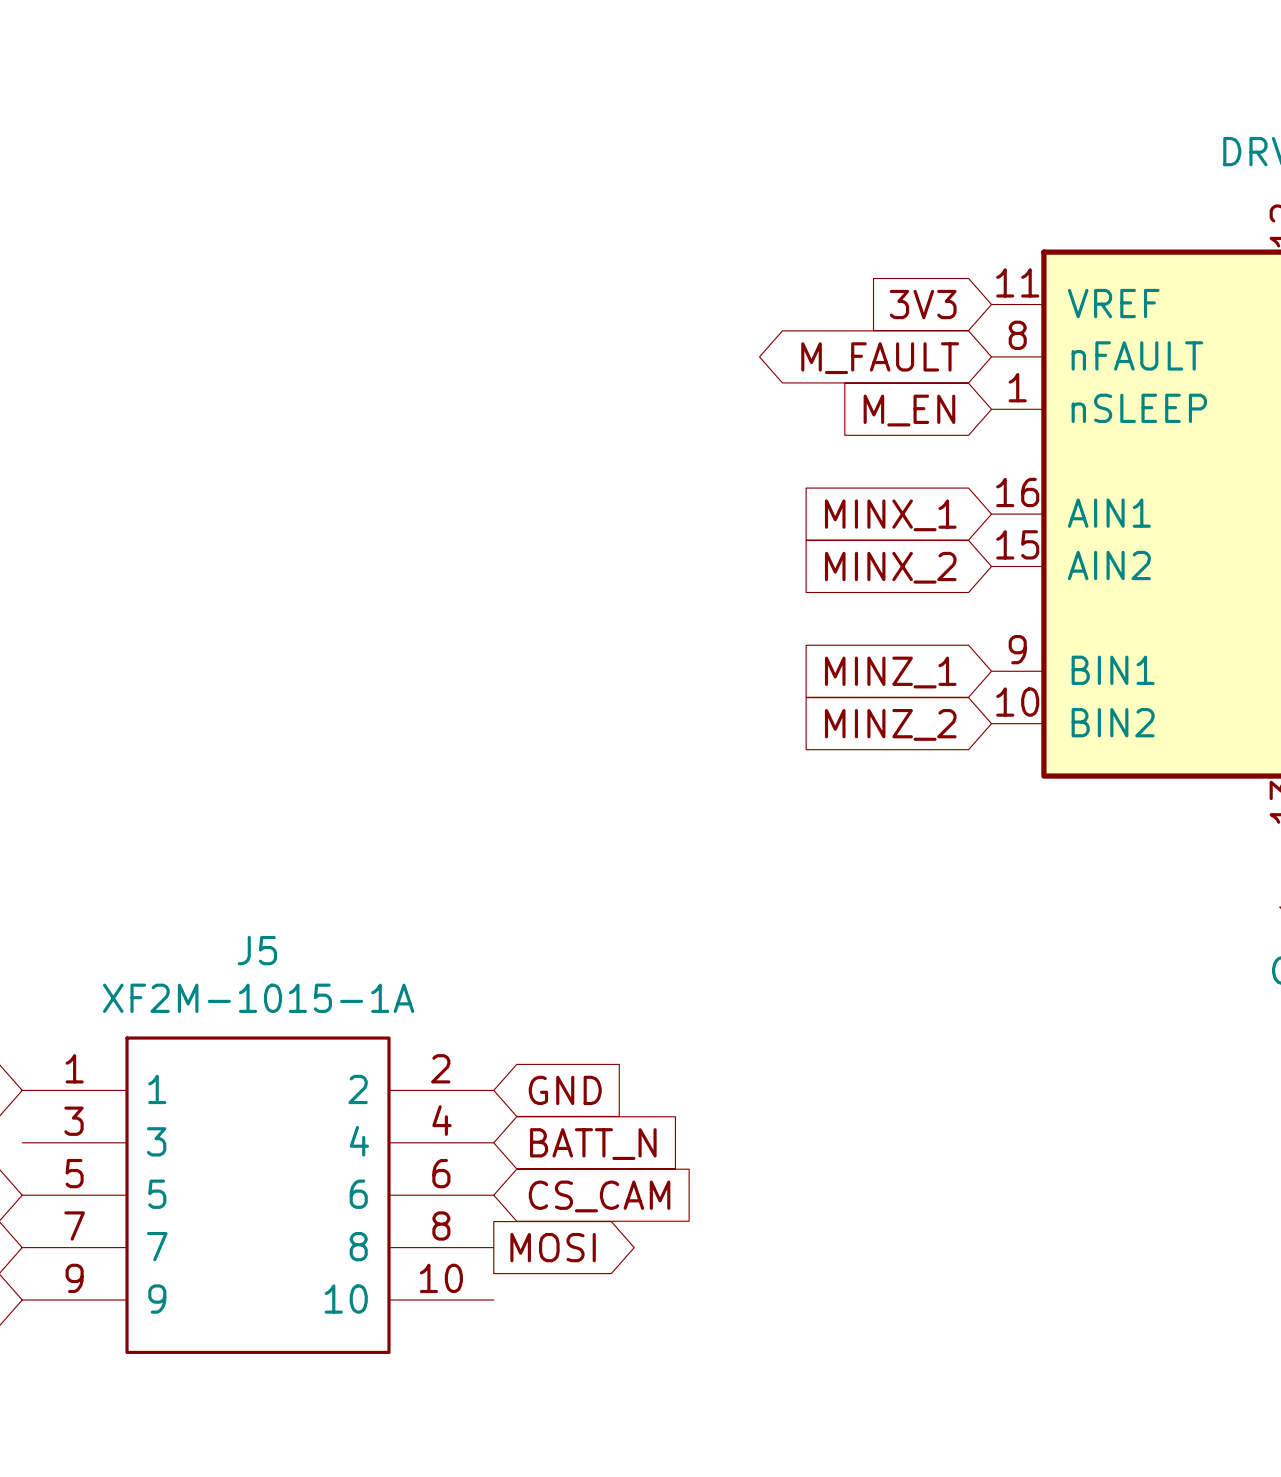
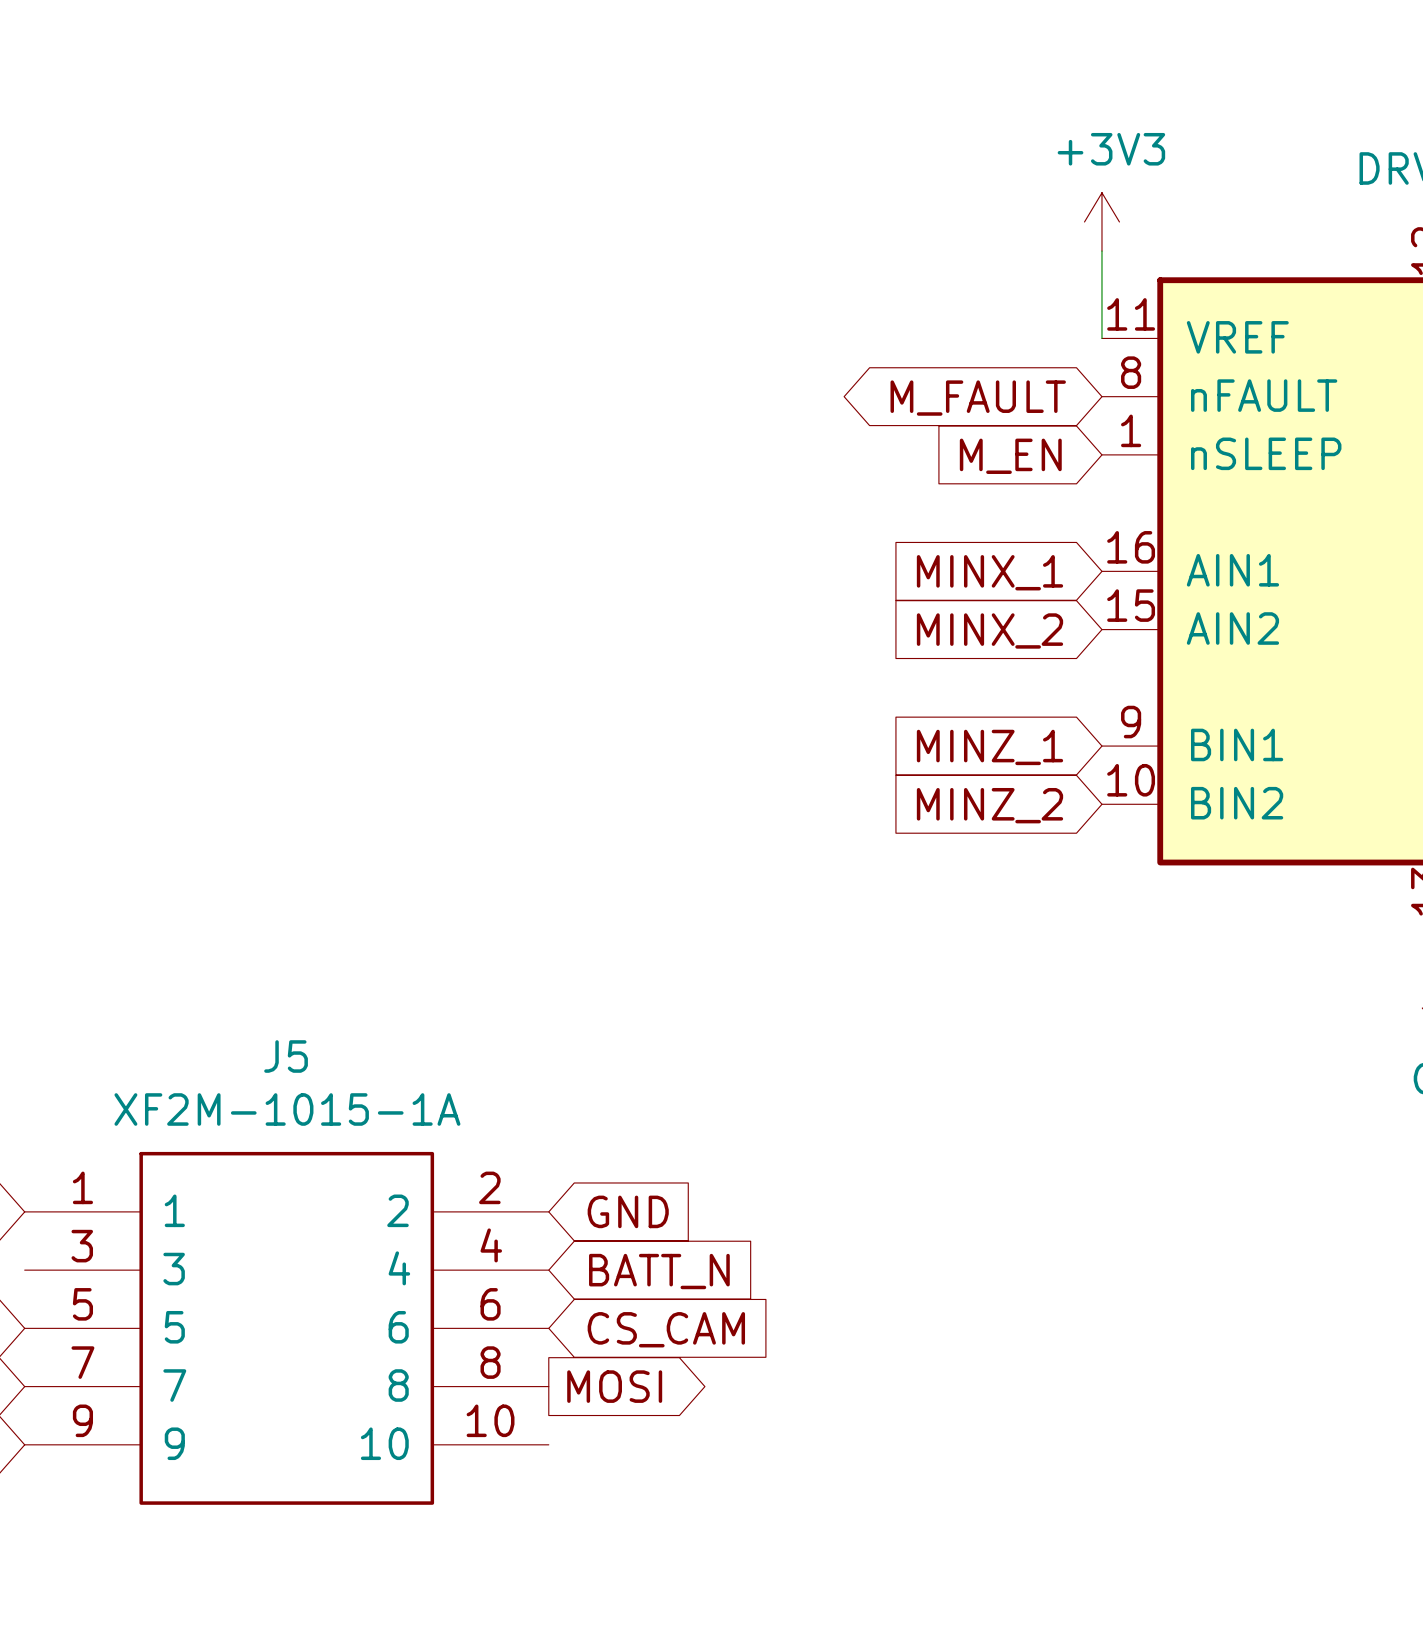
power symbol: none -> +3V3 (1101, 221)
wire: none -> (1101, 251) (1101, 338)
global label: 3V3 (923, 304) -> none

